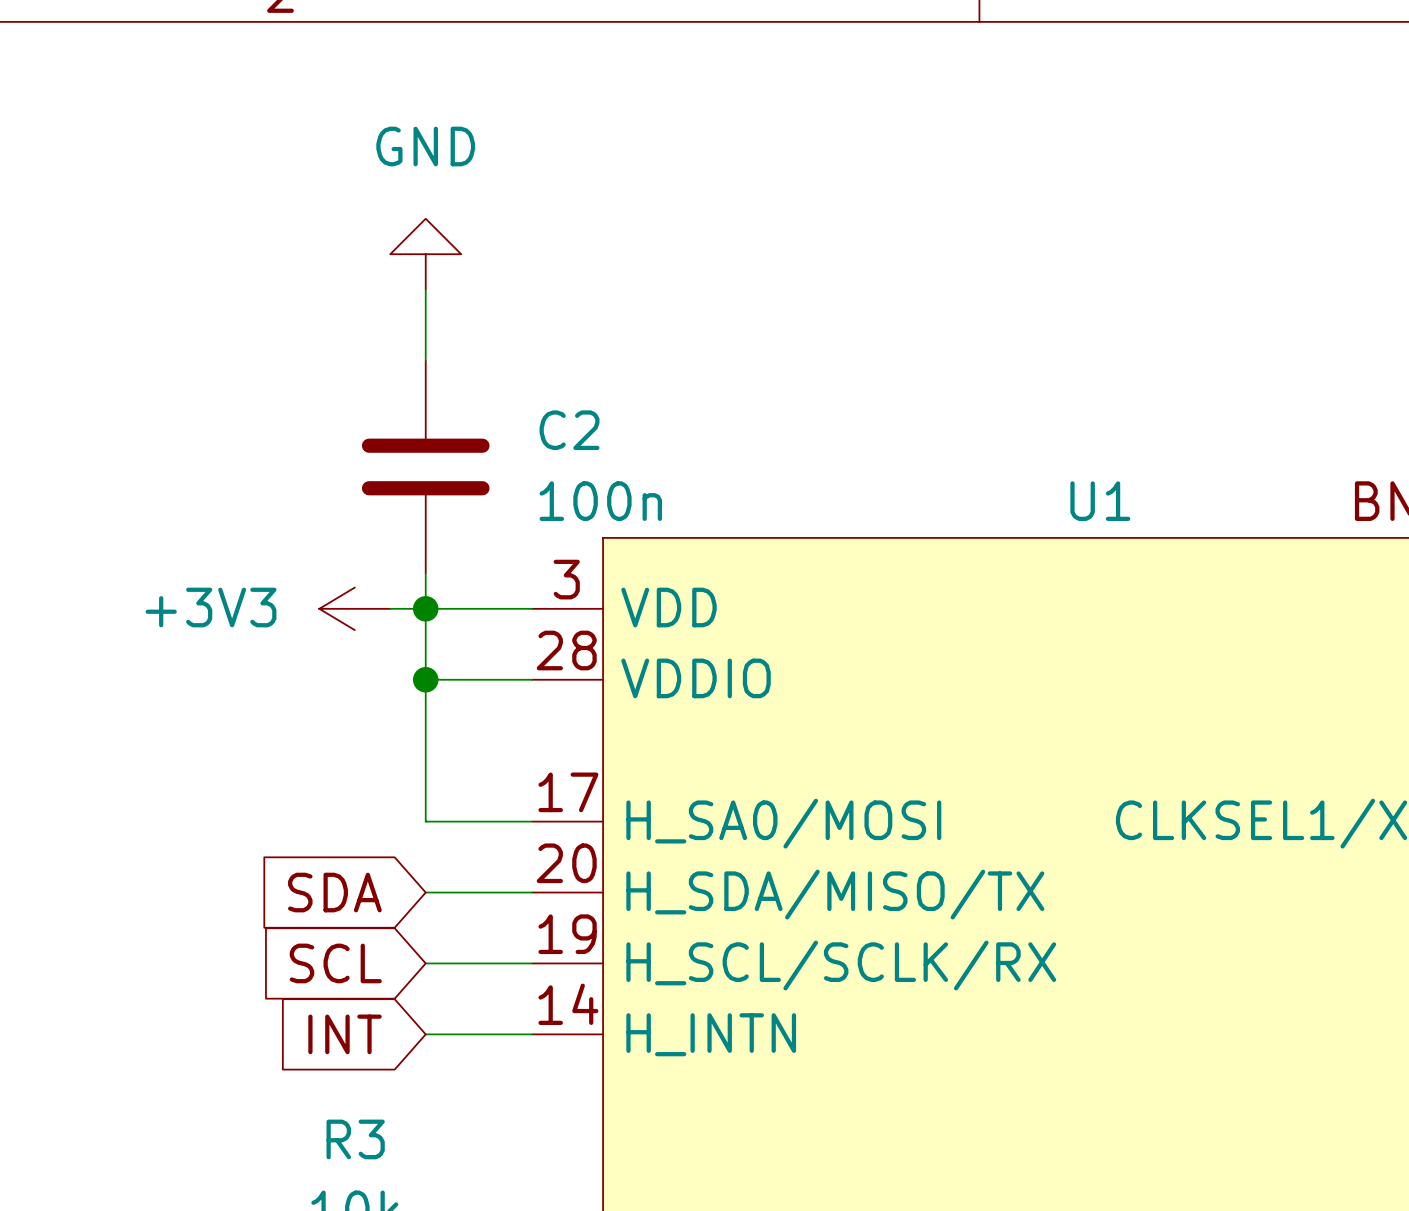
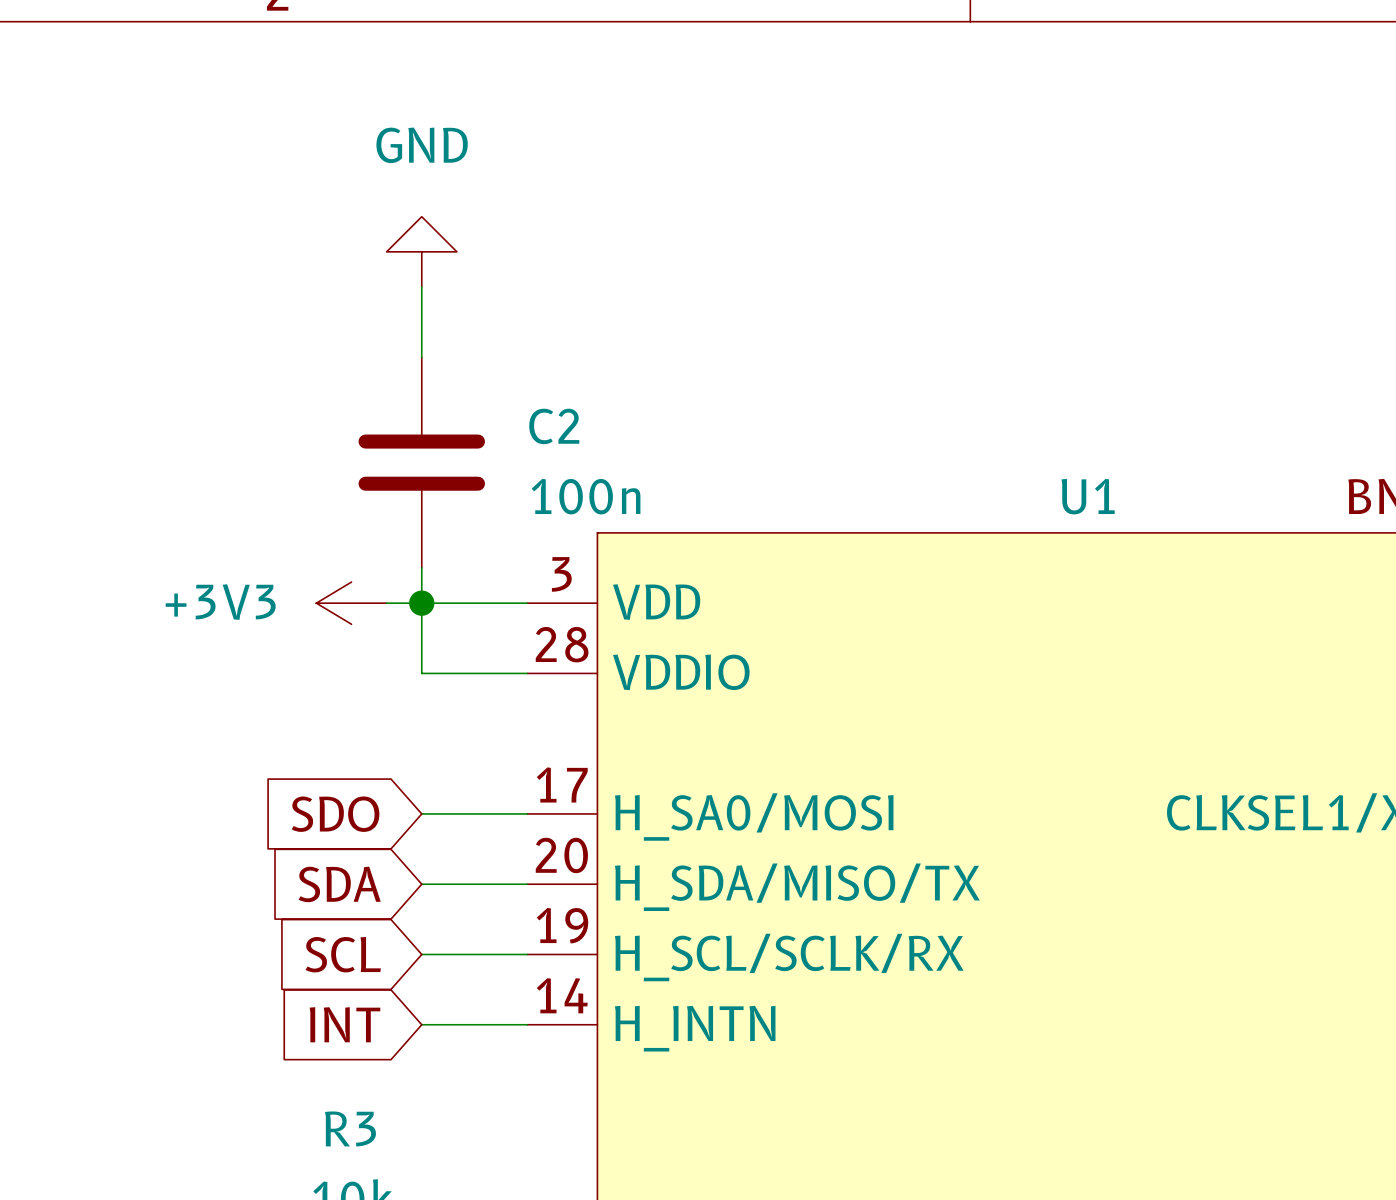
wire: (425, 679) (425, 821) -> none
junction: (425, 679) -> none
global label: none -> SDO (335, 814)

